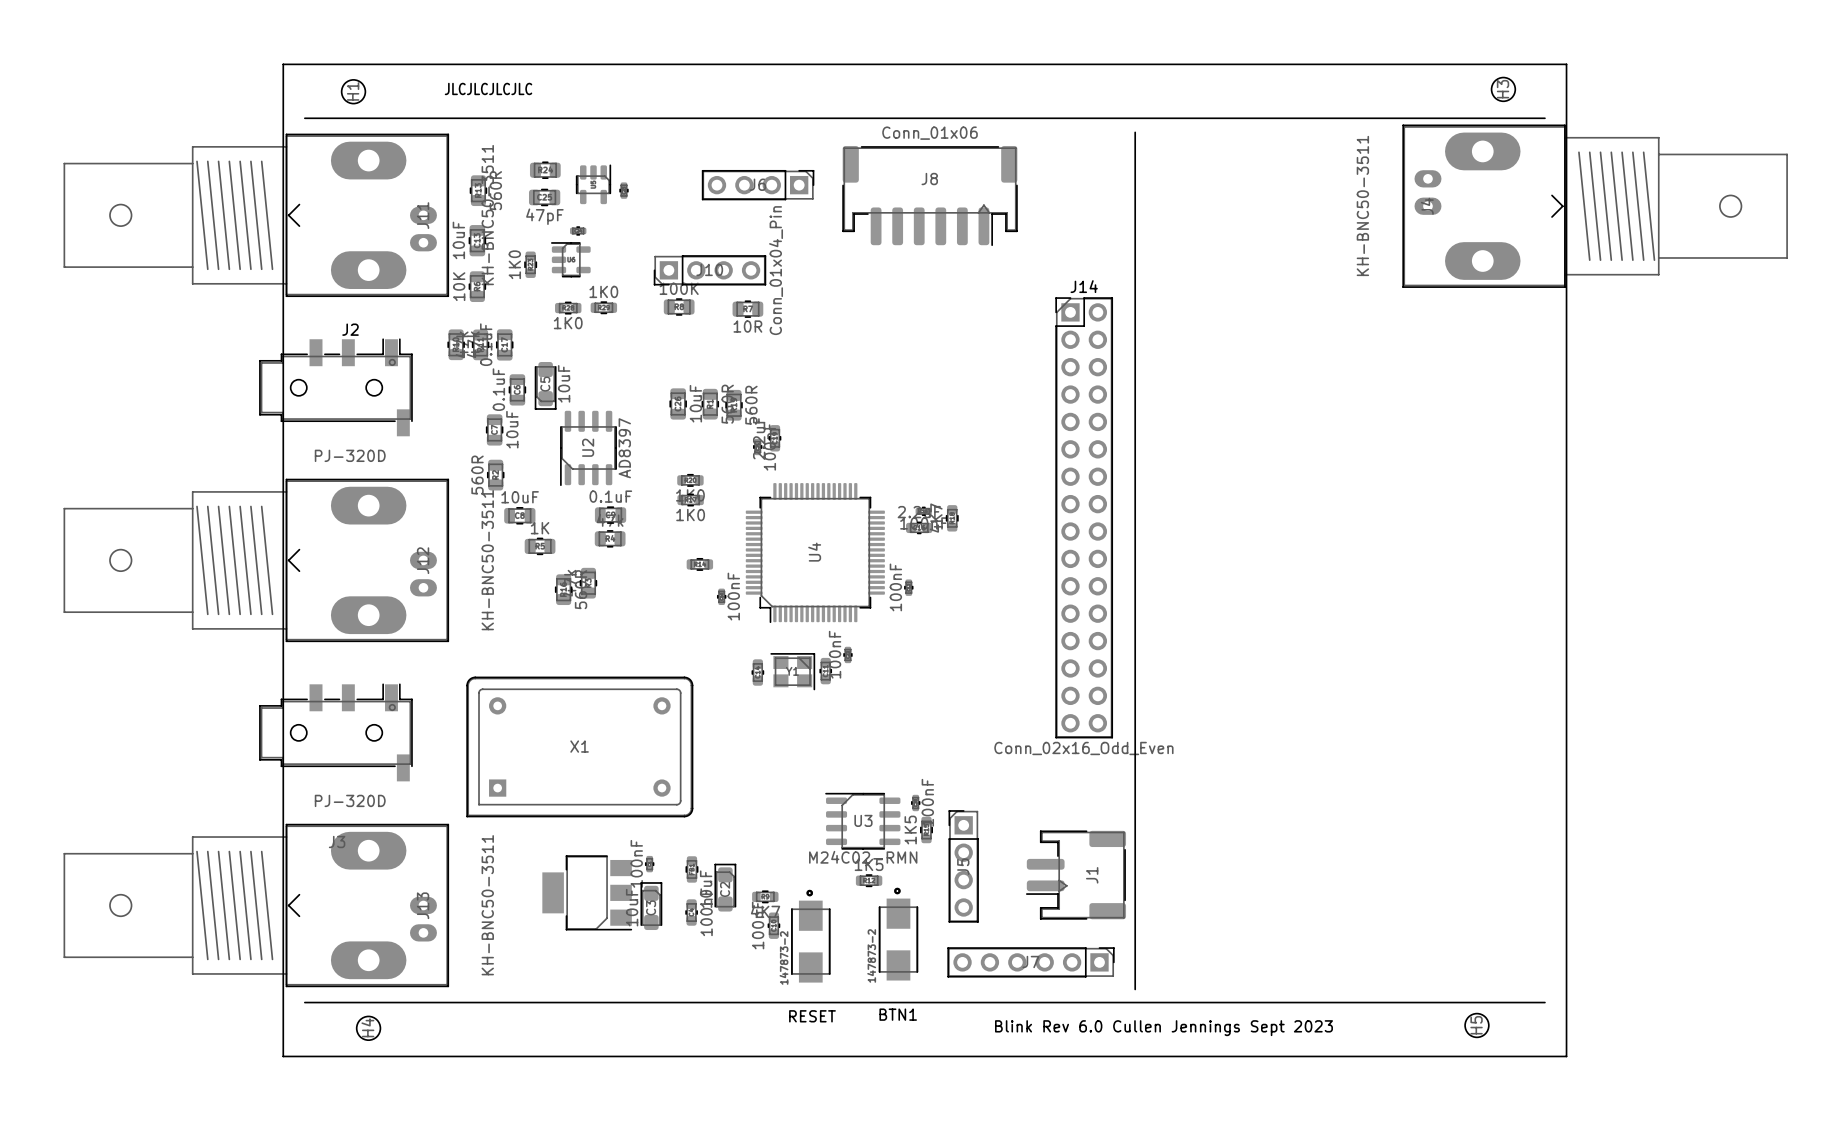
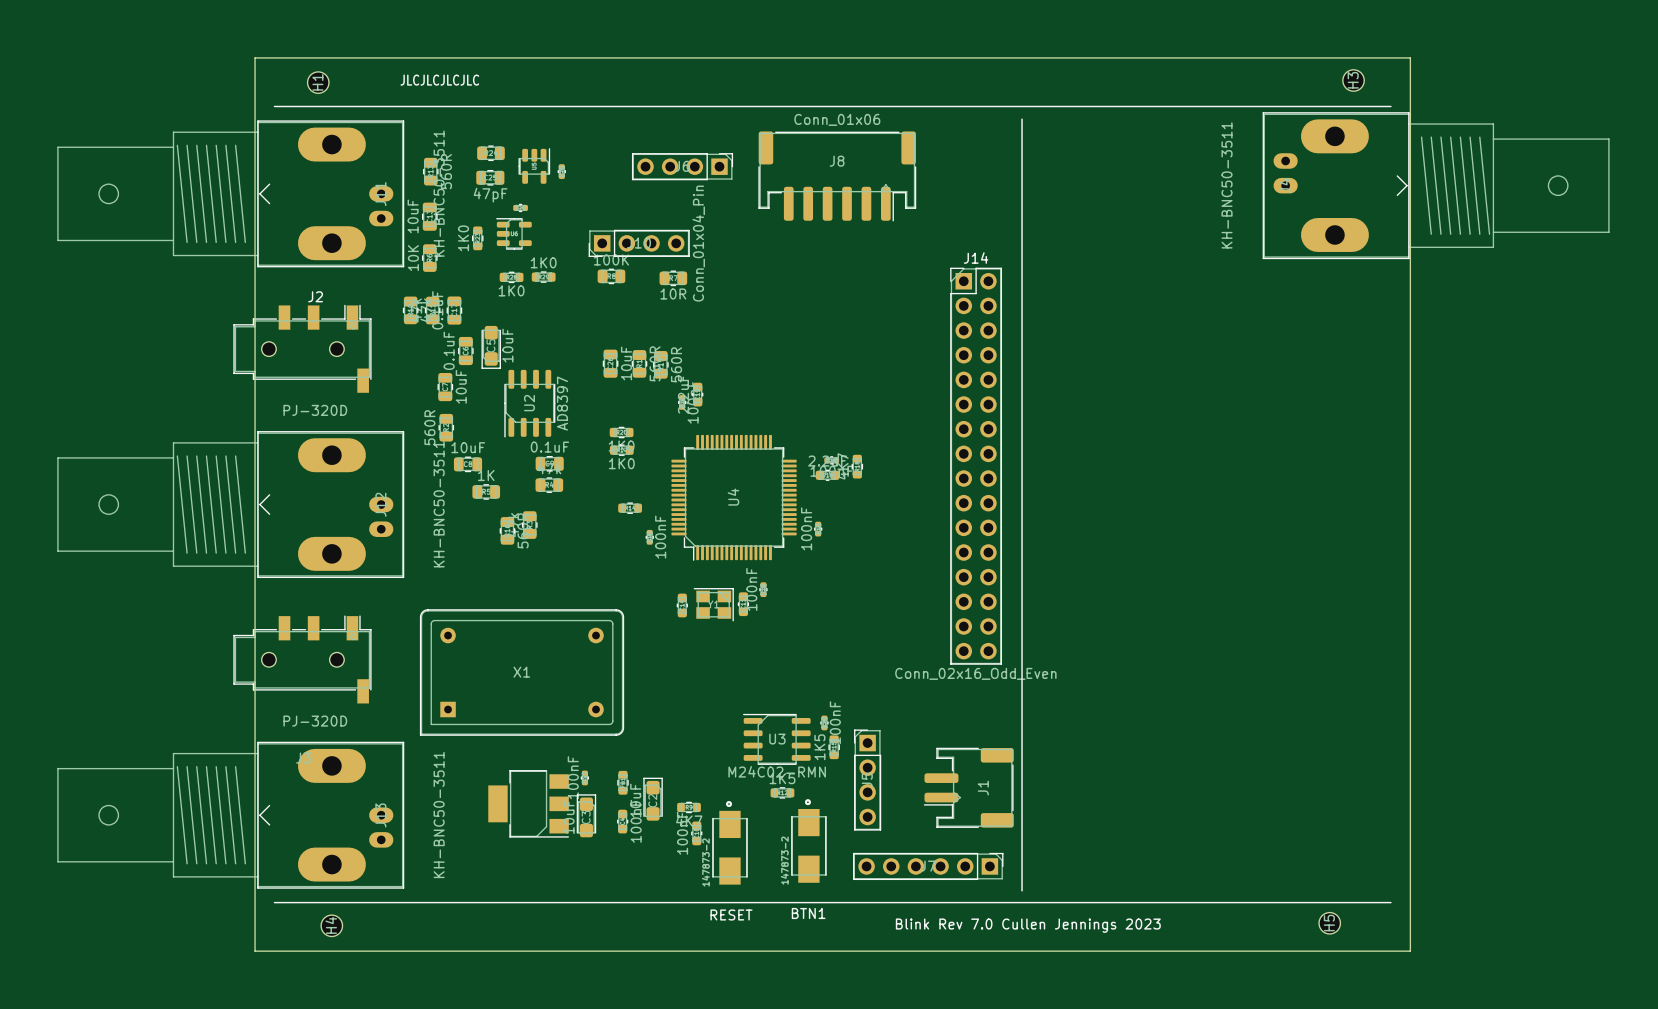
text: Blink Rev 6.0 Cullen Jennings Sept 2023 (1163, 1028) -> Blink Rev 7.0 Cullen Jennings 2023 (1028, 925)

